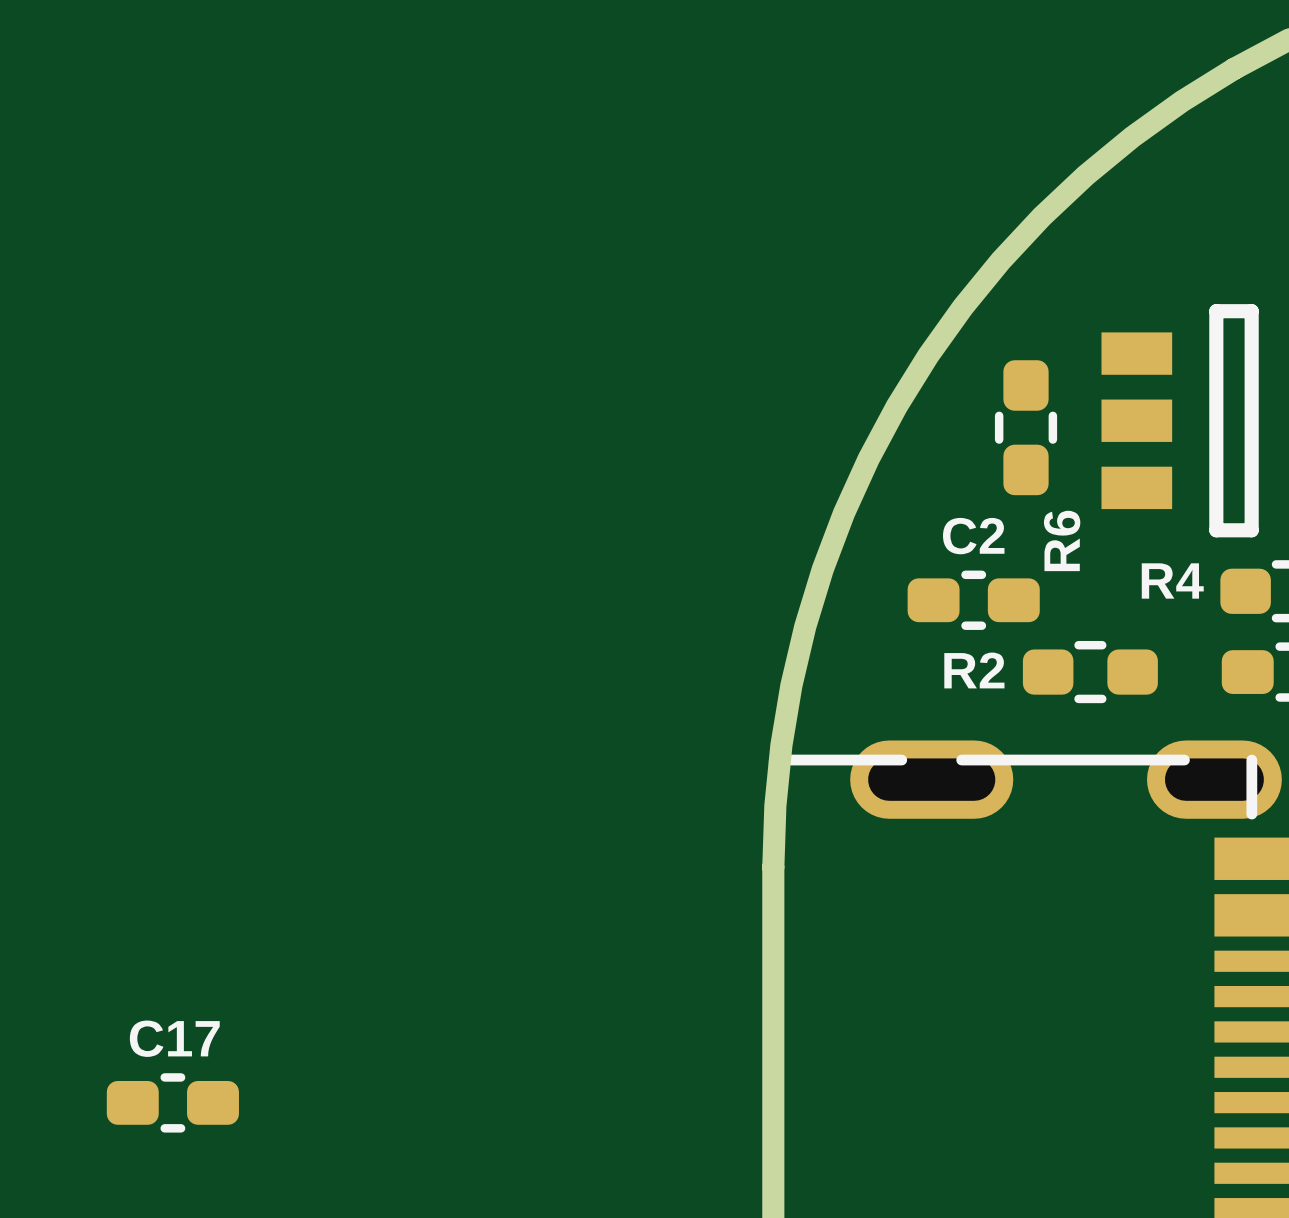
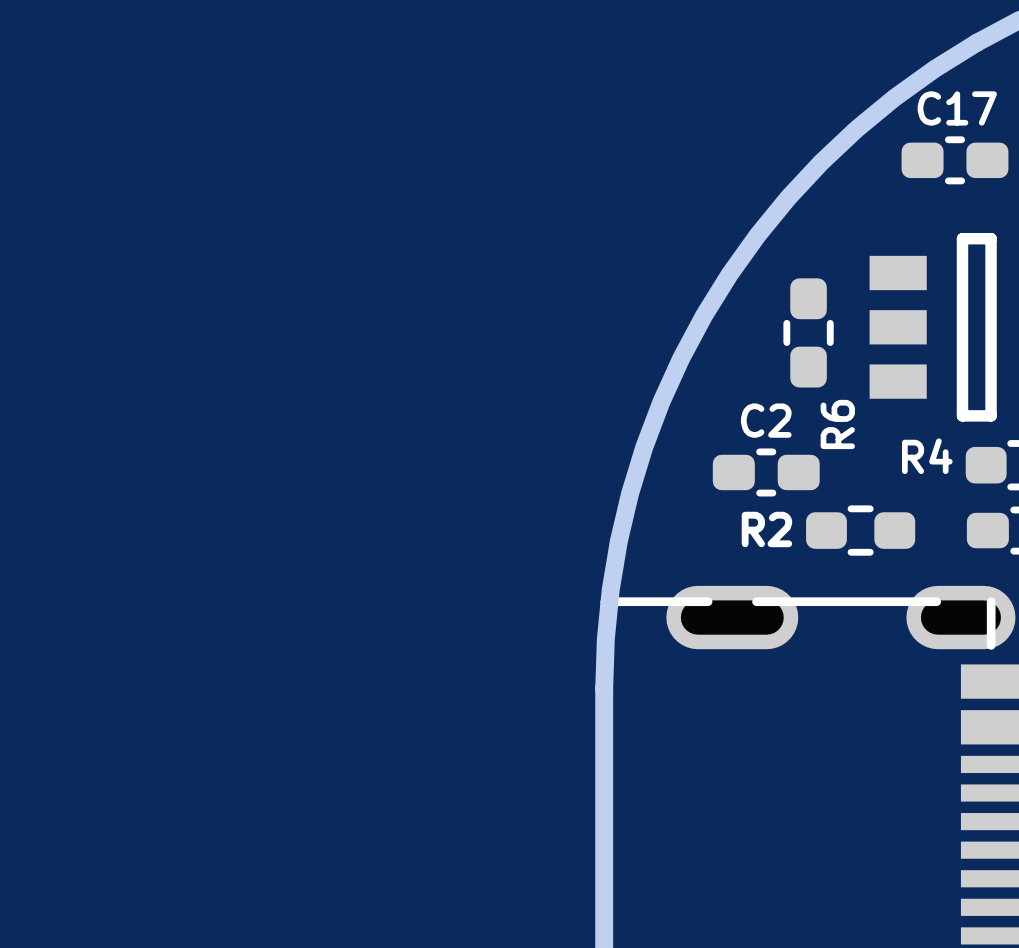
C17 position: (172, 1102) -> (954, 160)

